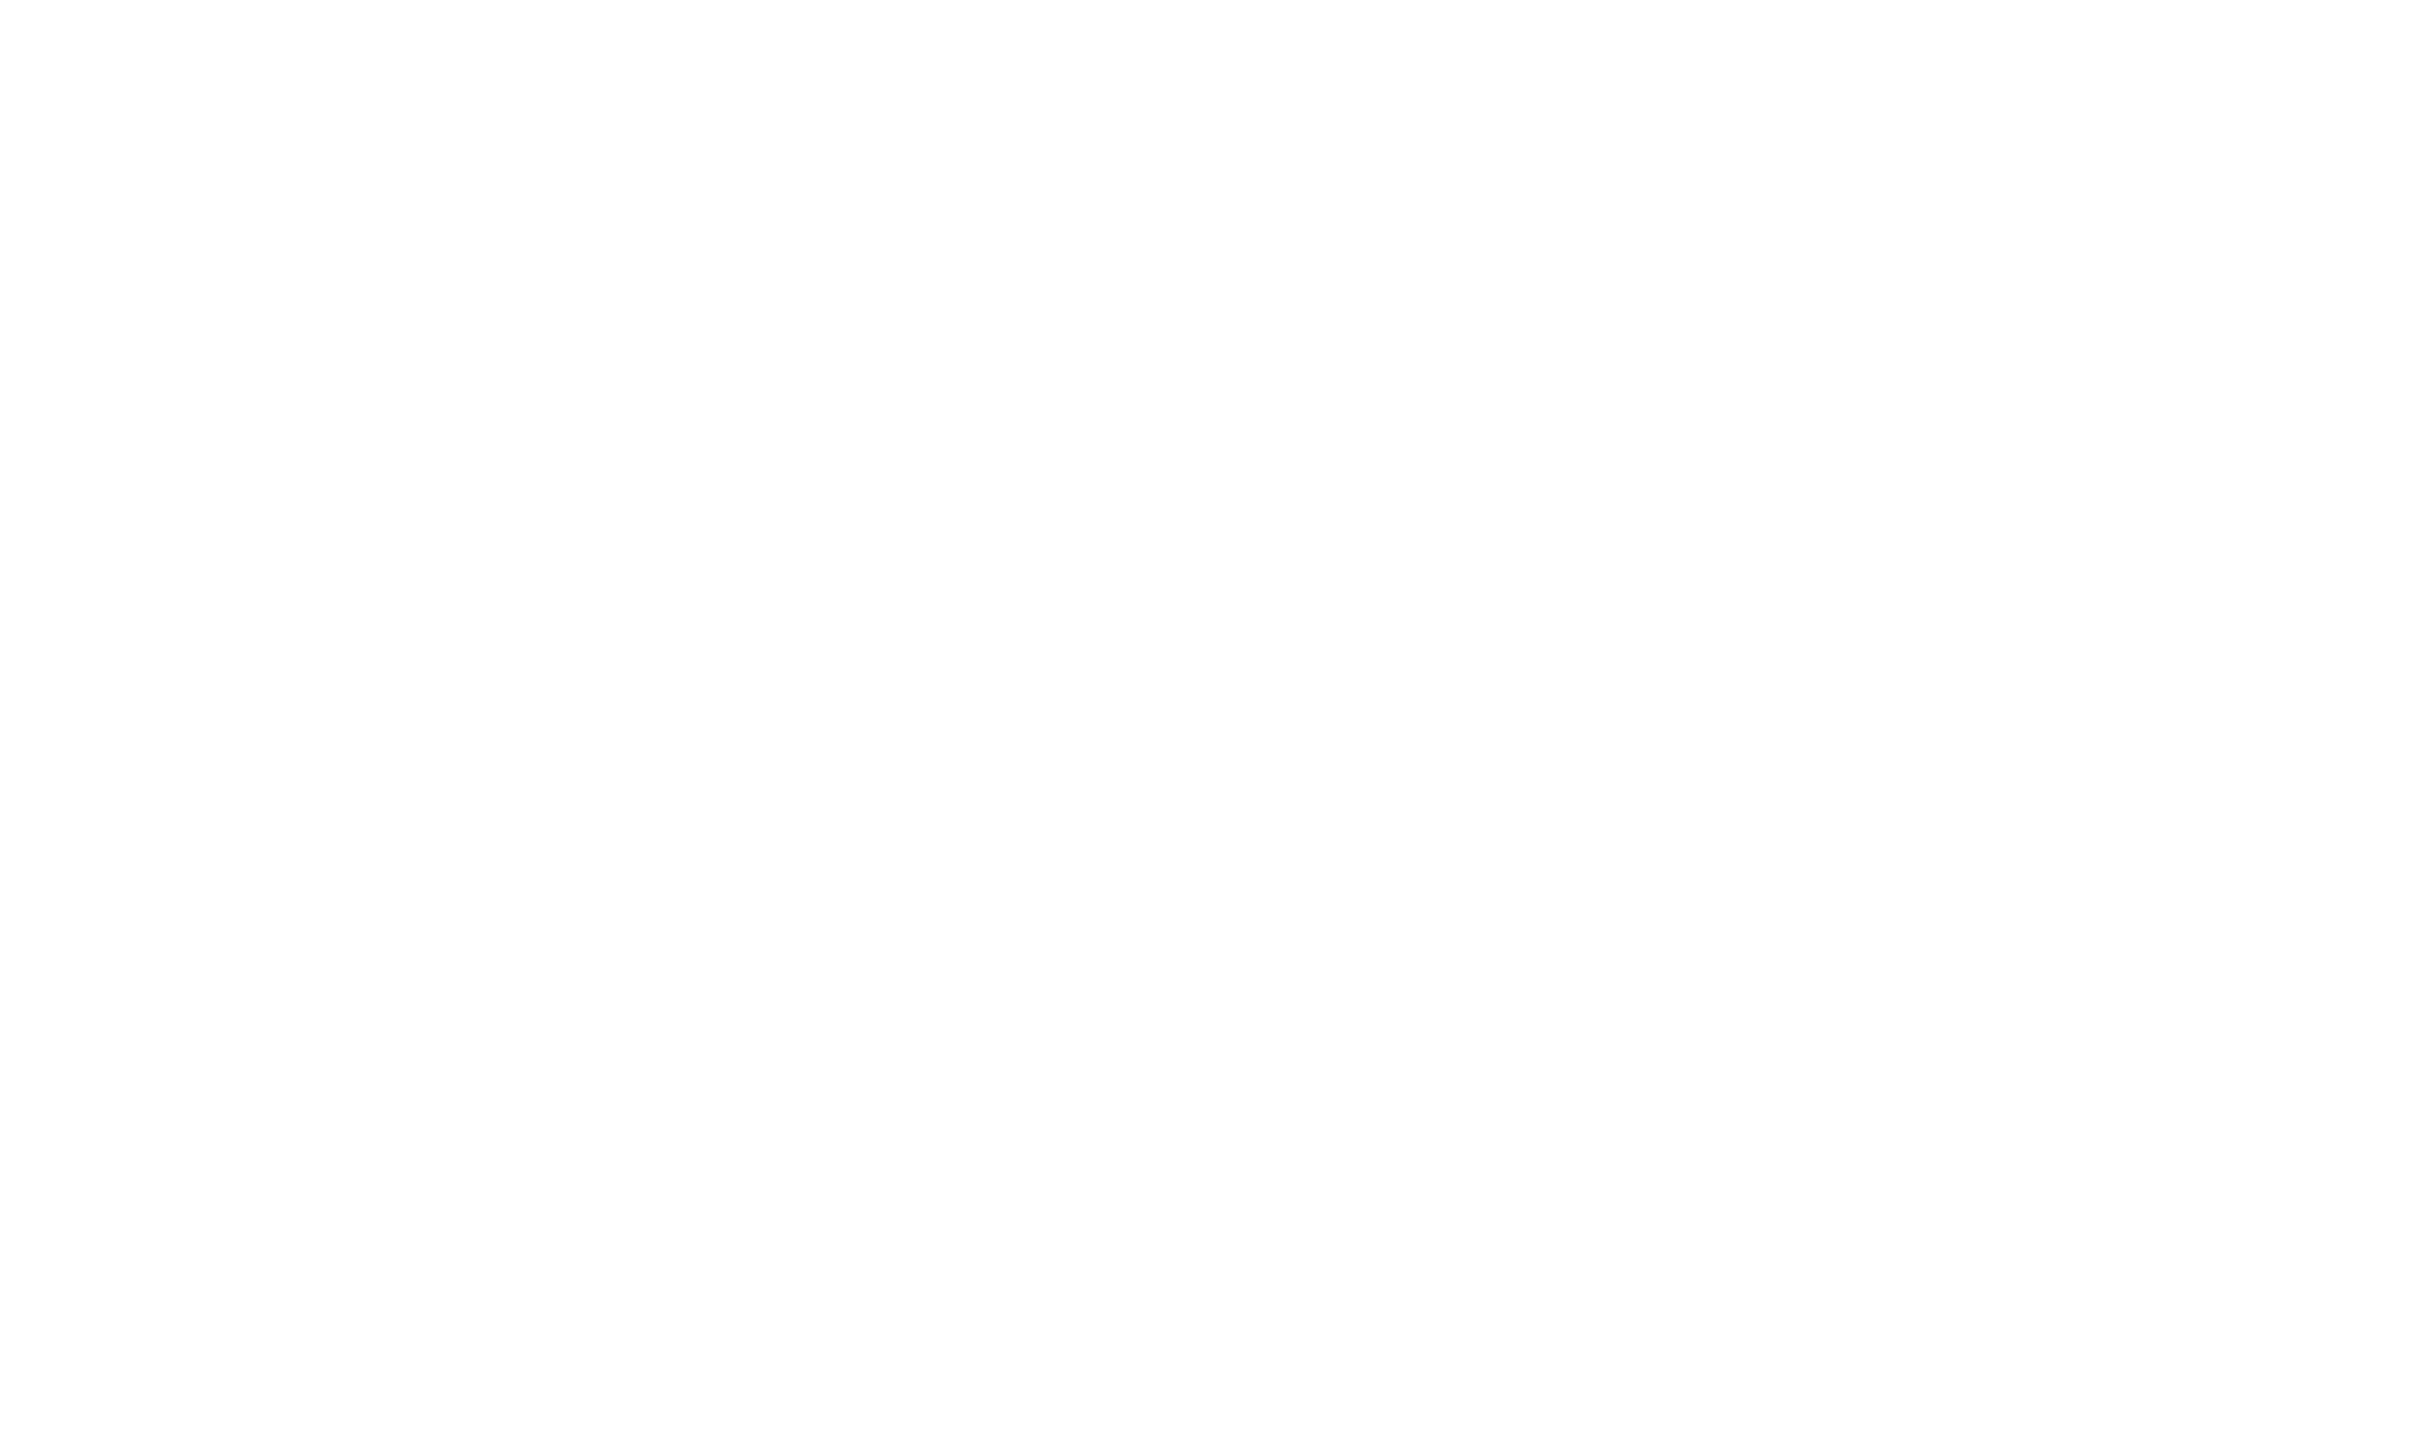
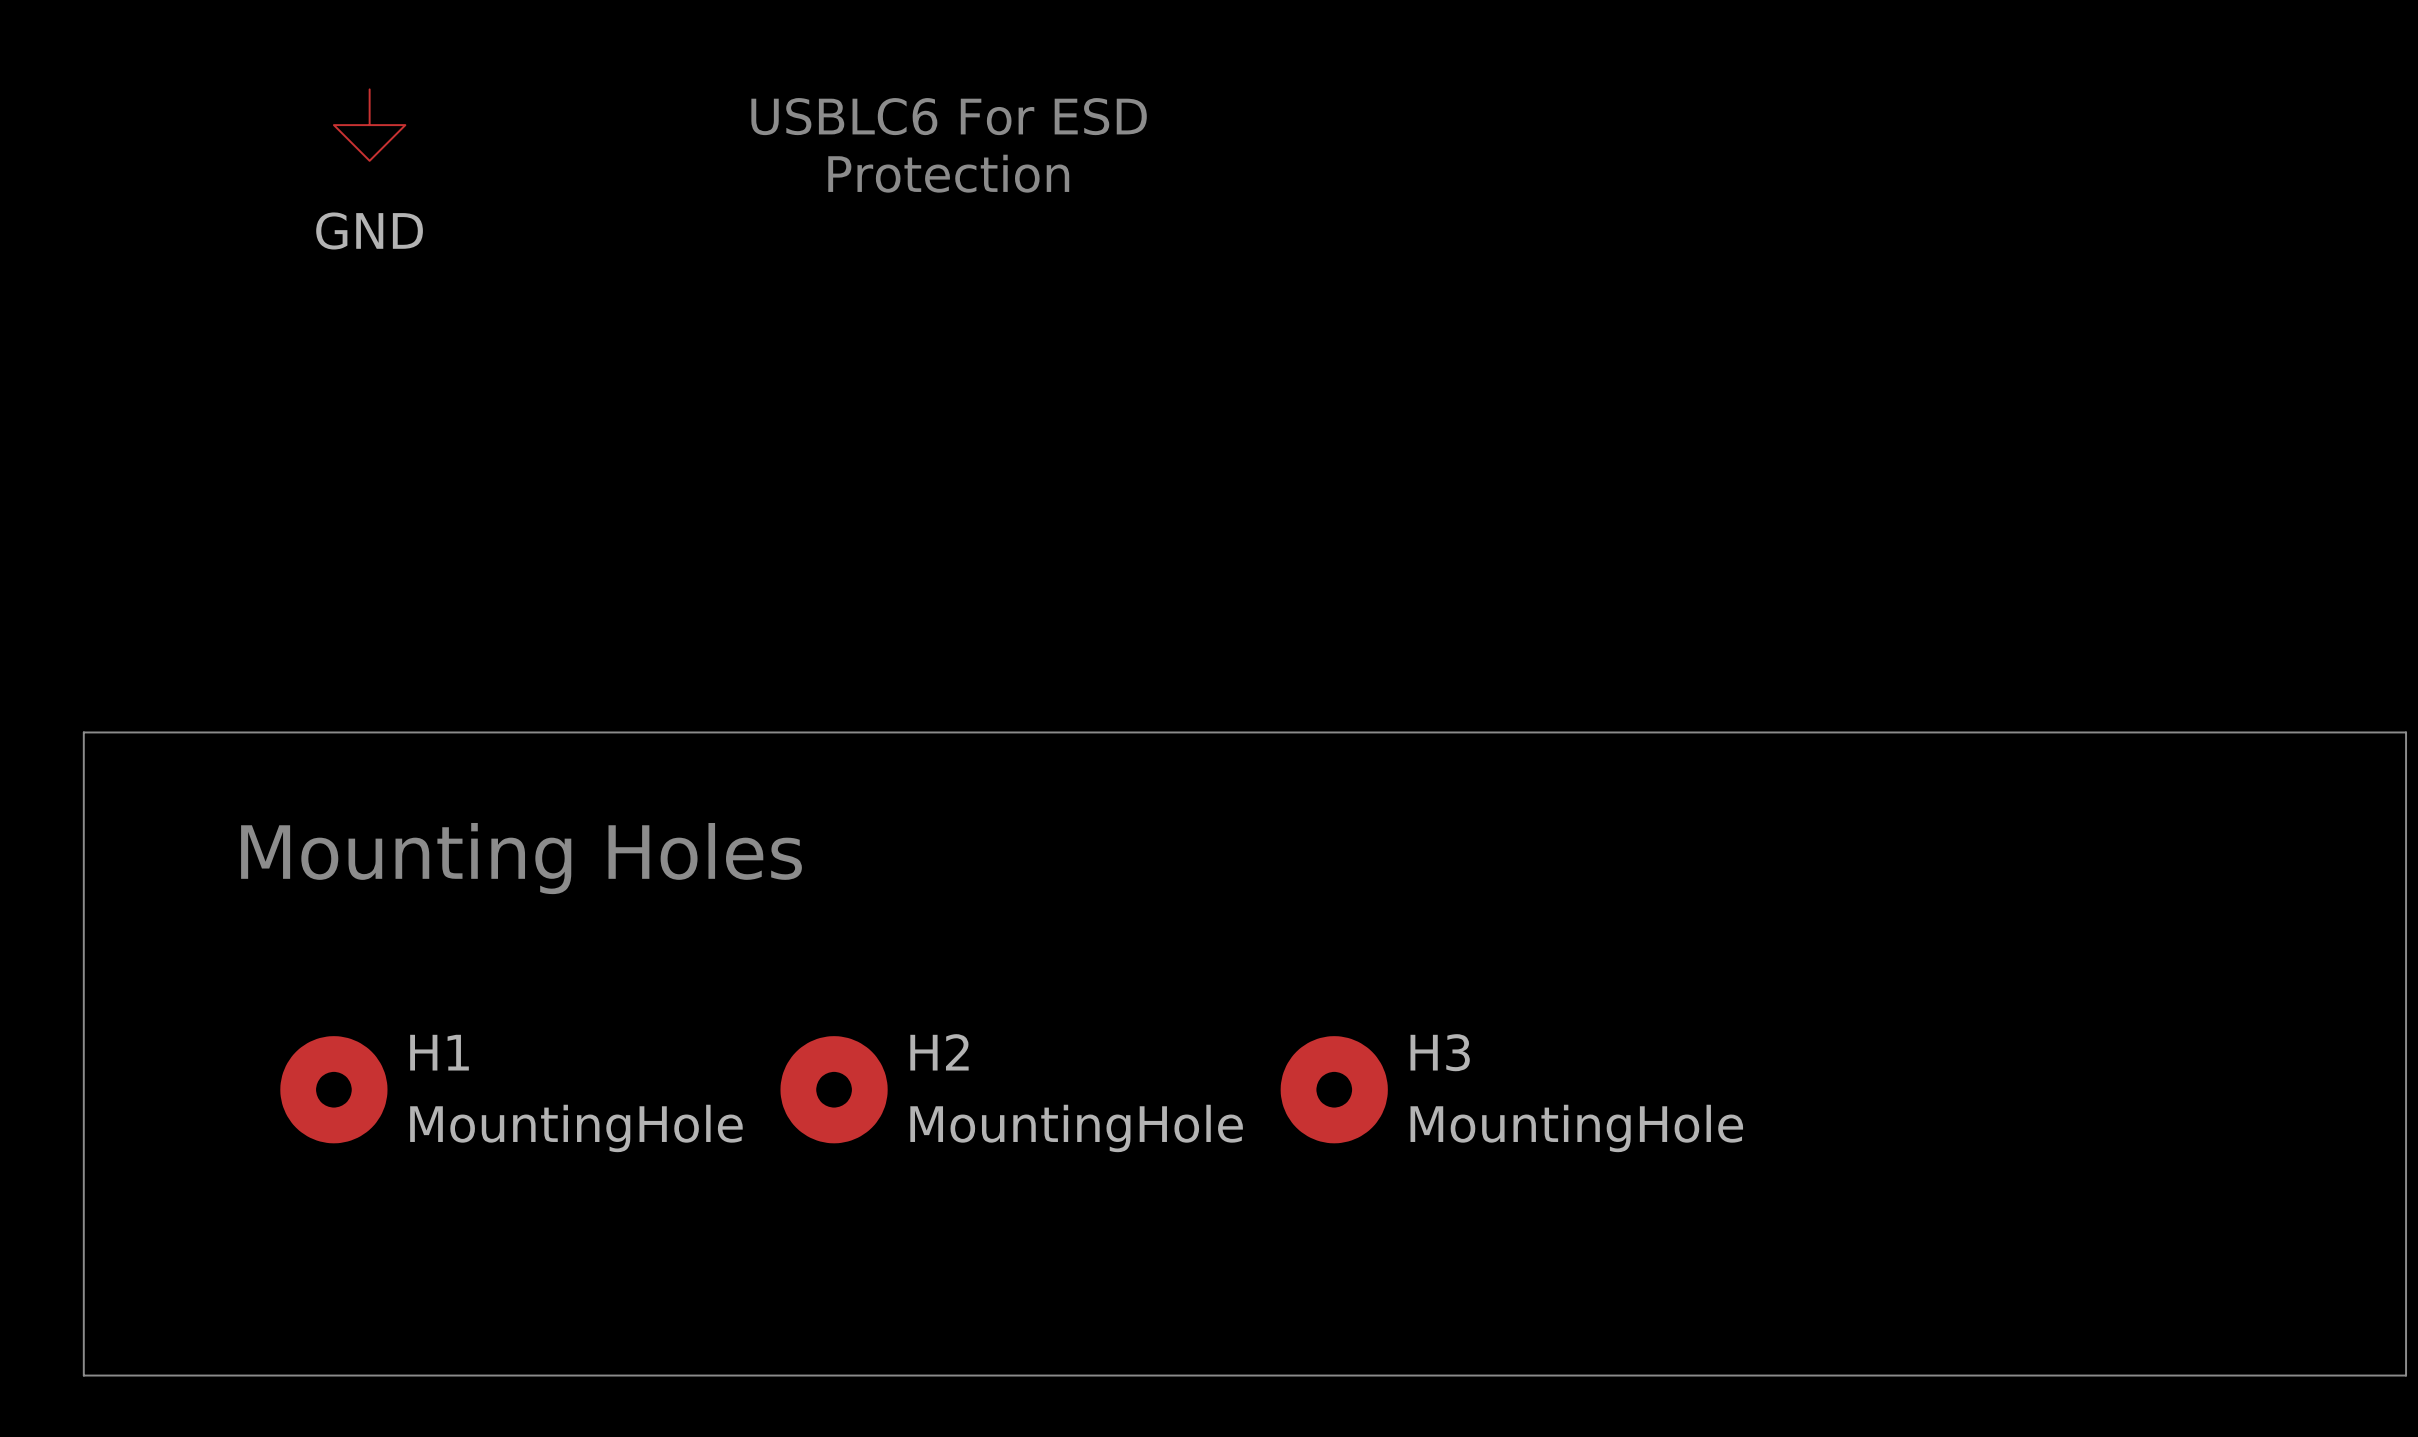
text: none -> USBLC6 For ESD (949, 116)
power symbol: none -> GND (369, 125)
text: none -> Protection (948, 173)
line: none -> (83, 732) (2406, 732) (2406, 1375) (83, 1375) (83, 732)
text: none -> Mounting Holes (521, 858)
H1: none -> MountingHole (333, 1089)
H2: none -> MountingHole (834, 1089)
H3: none -> MountingHole (1334, 1089)

